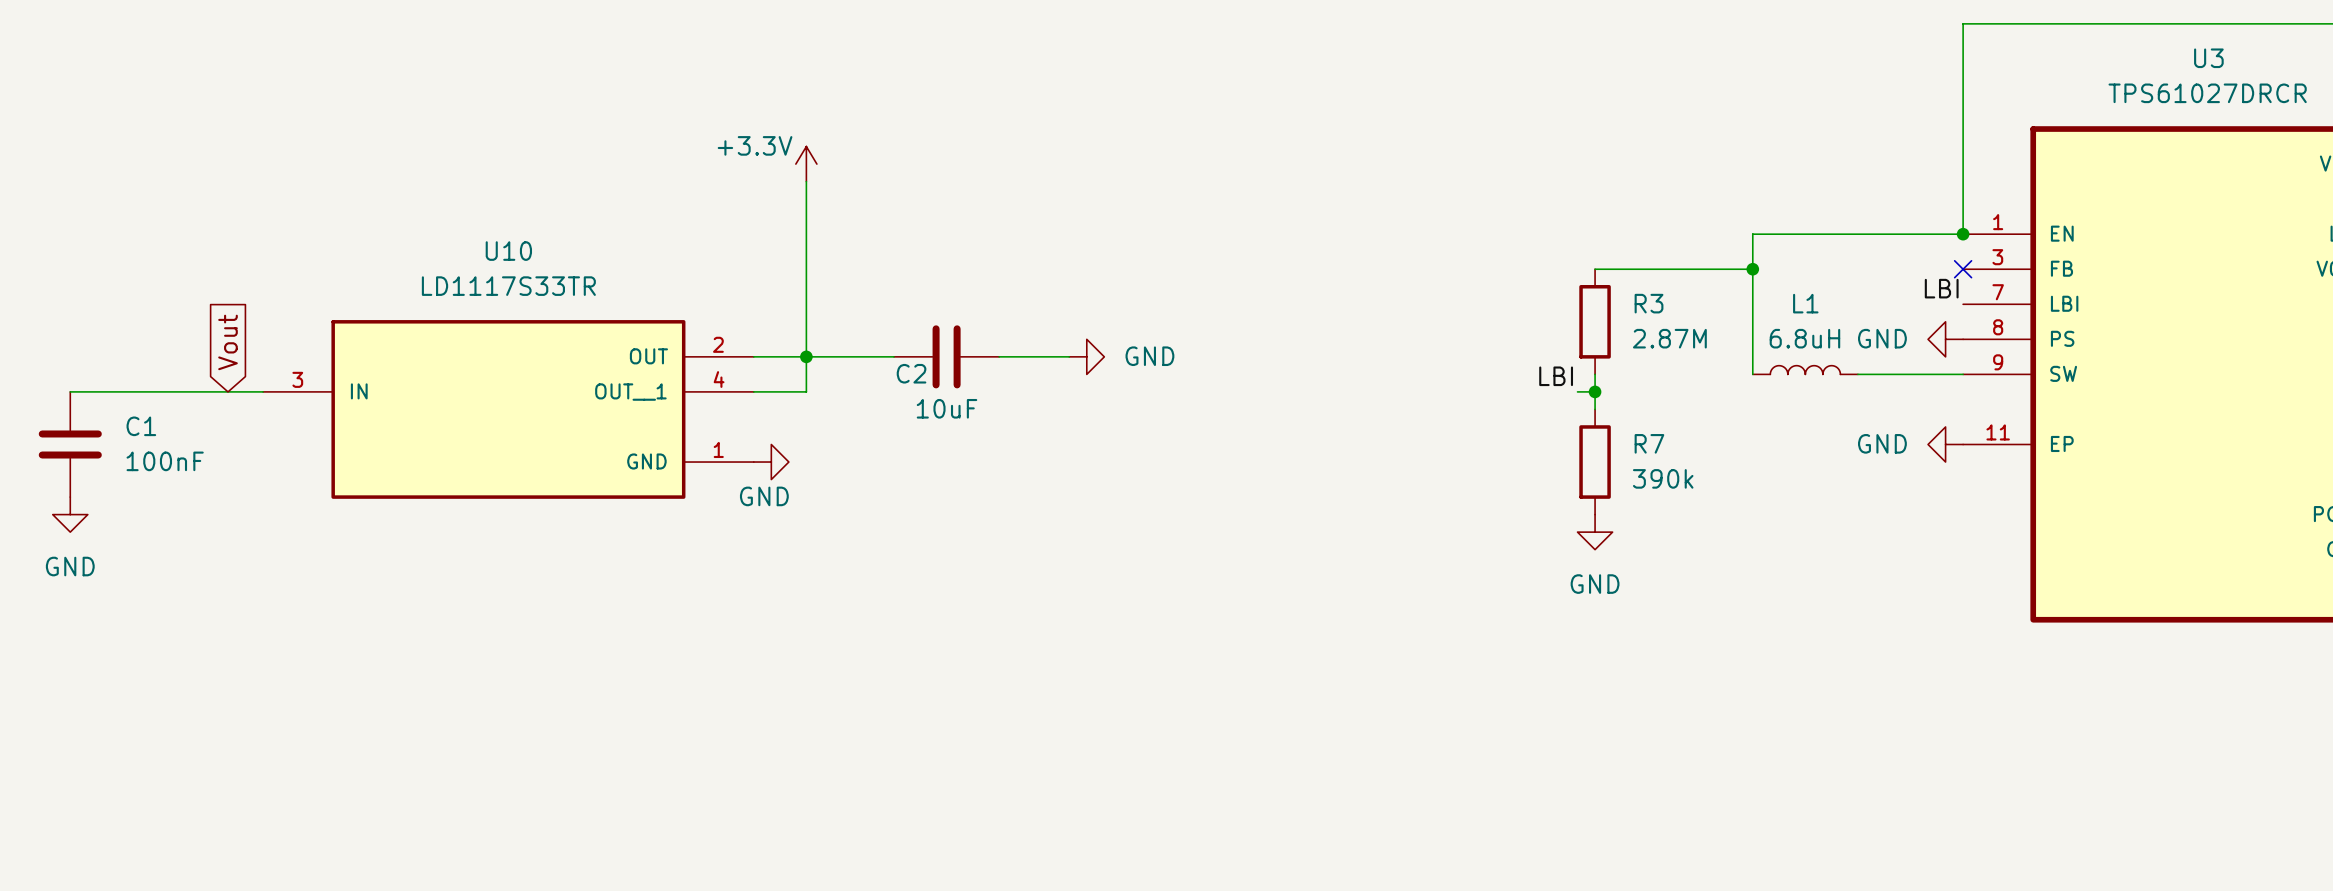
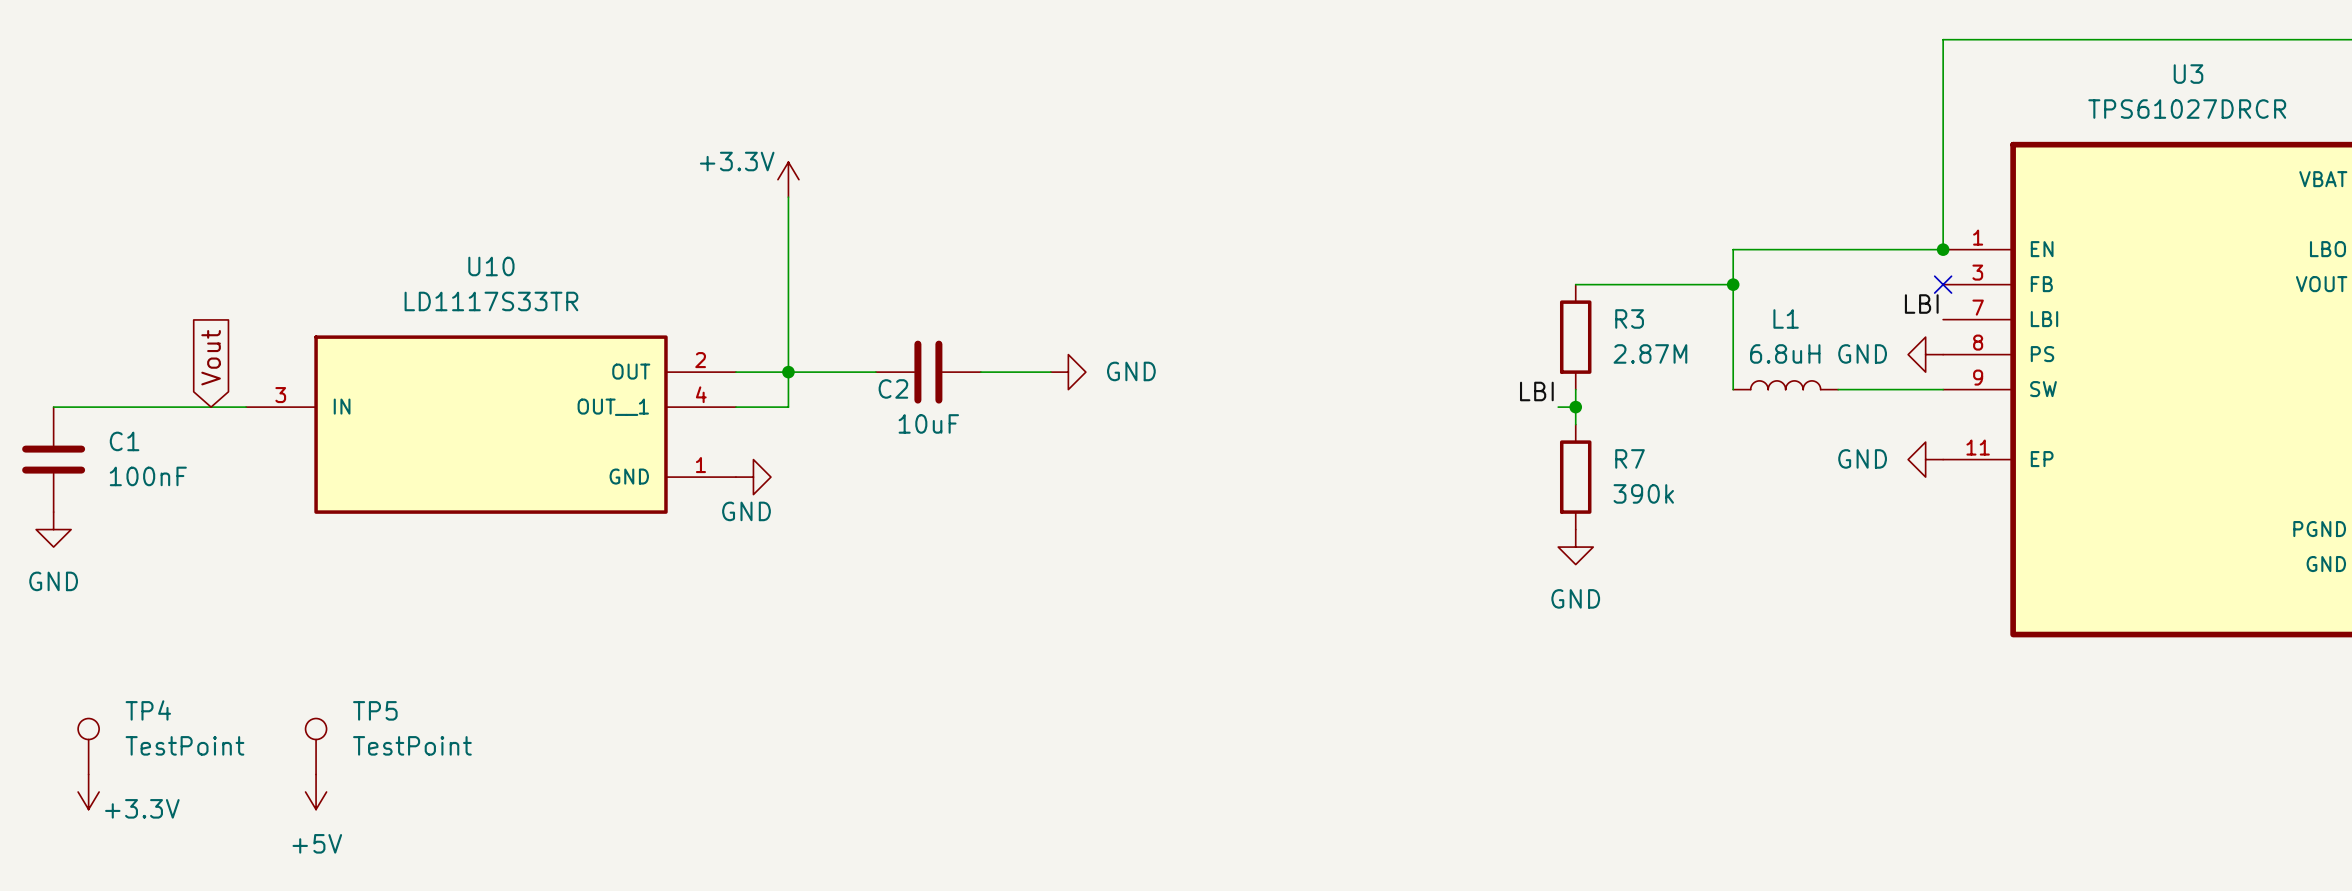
TP4: none -> TestPoint (88, 746)
TP5: none -> TestPoint (316, 746)
power symbol: none -> +3.3V (88, 792)
power symbol: none -> +5V (316, 792)

